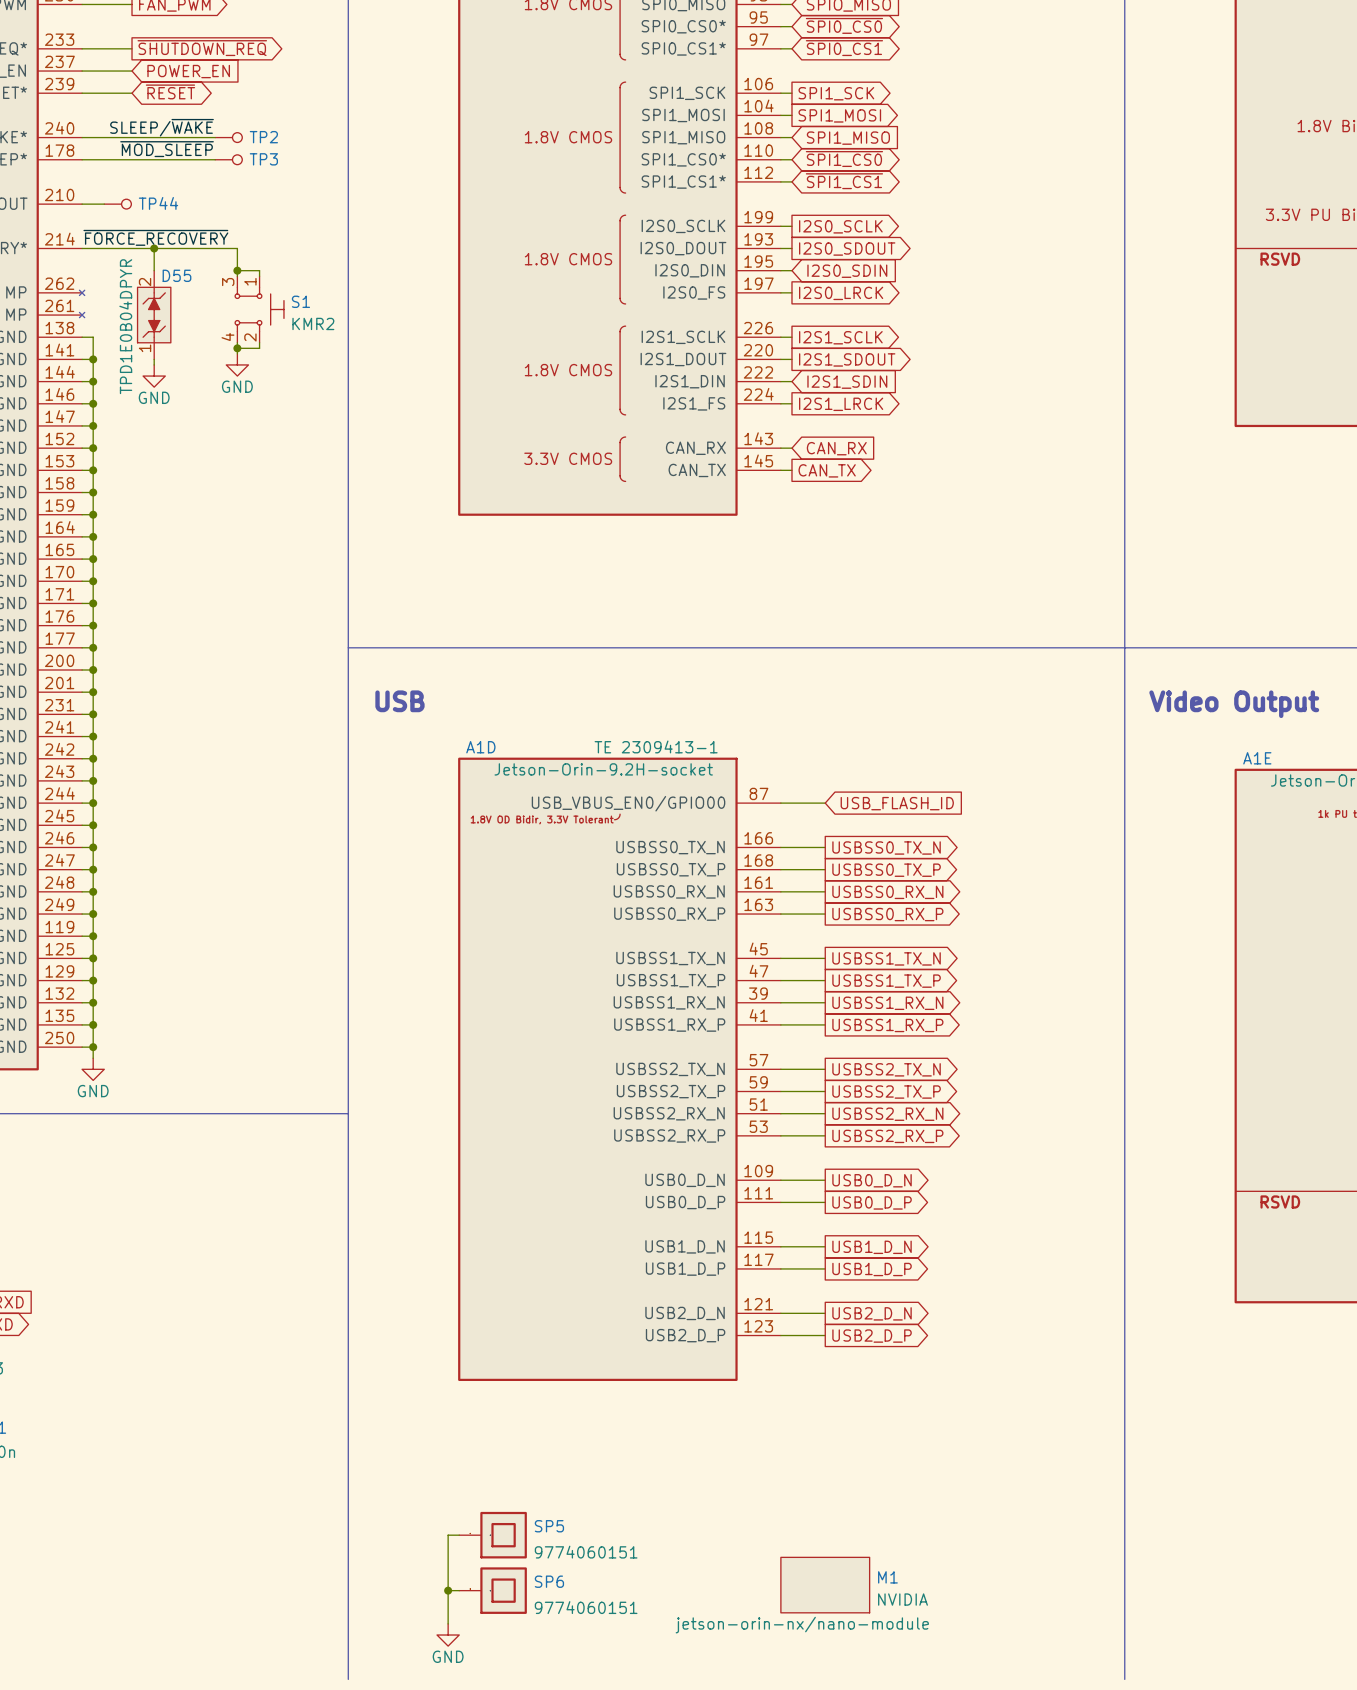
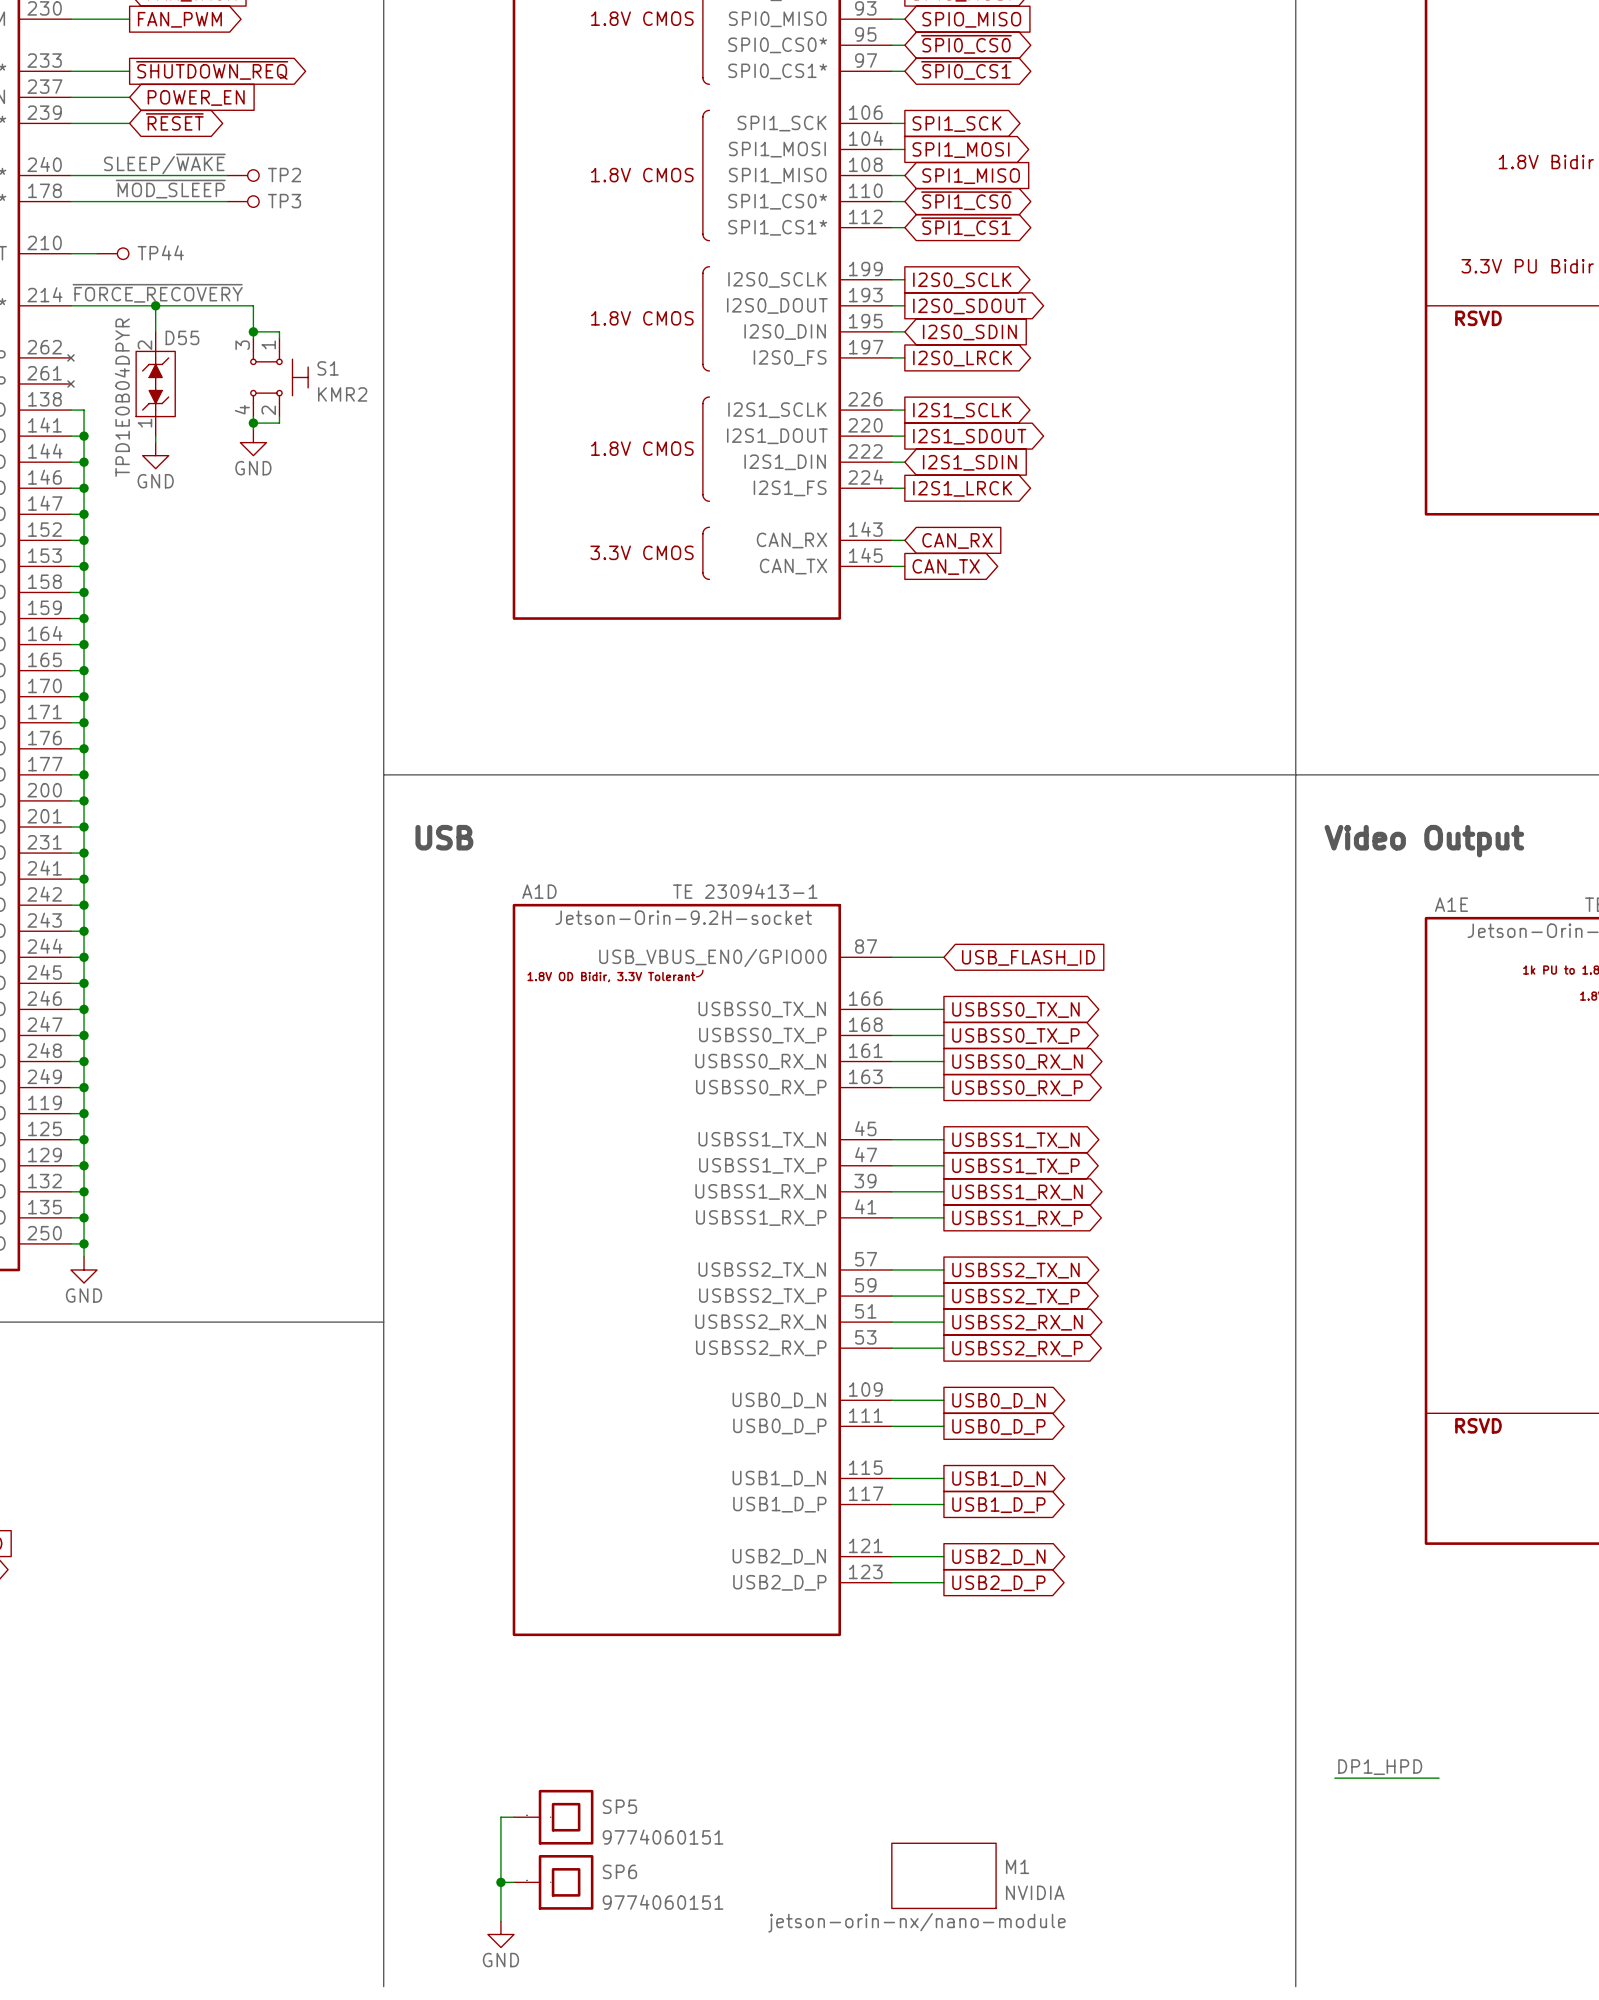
label: none -> DP1_HPD (1380, 1767)
wire: none -> (1334, 1778) (1439, 1778)

